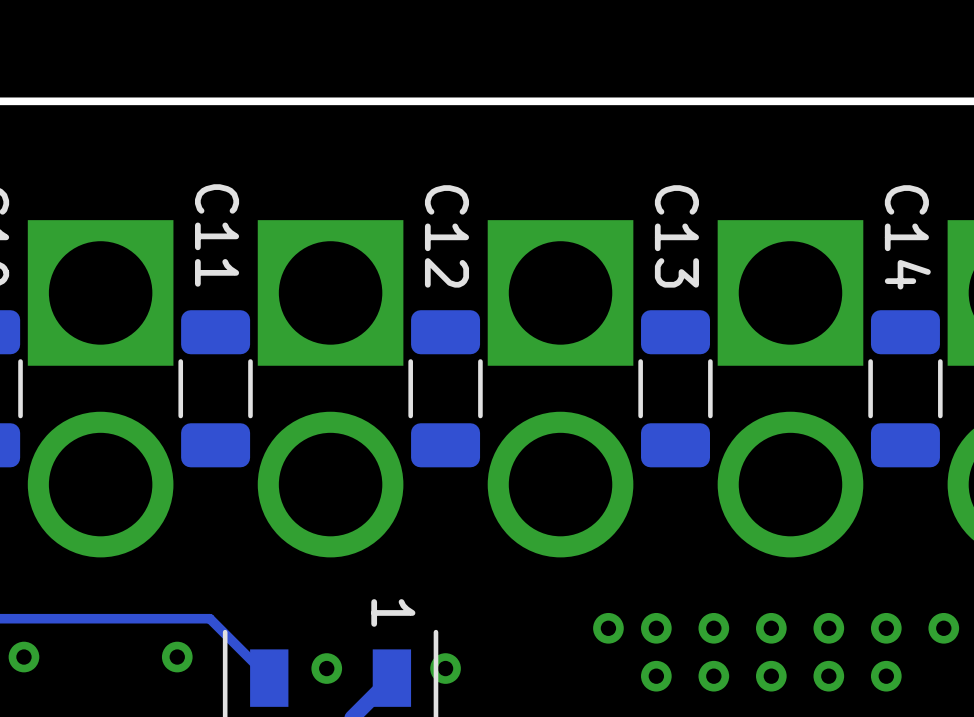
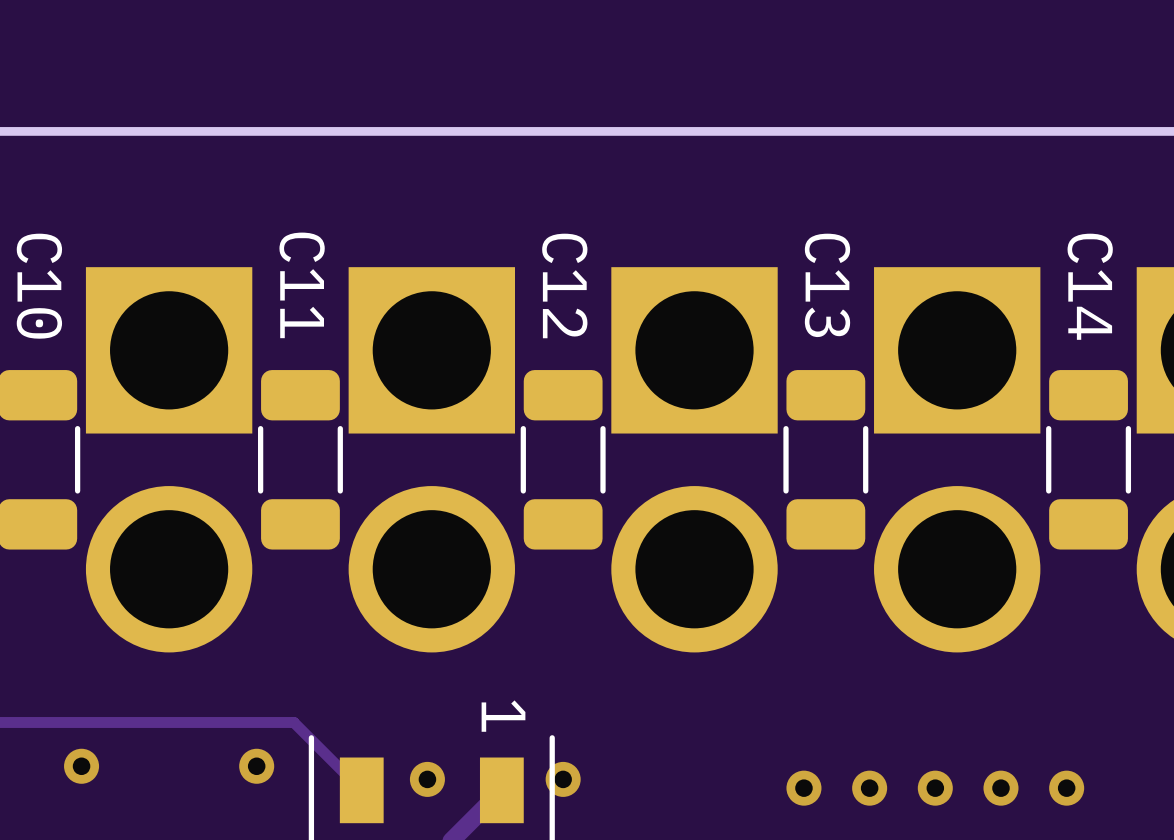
via: (608, 628) -> none
via: (656, 628) -> none
via: (713, 628) -> none
via: (771, 628) -> none
via: (828, 628) -> none
via: (886, 628) -> none
via: (943, 628) -> none

